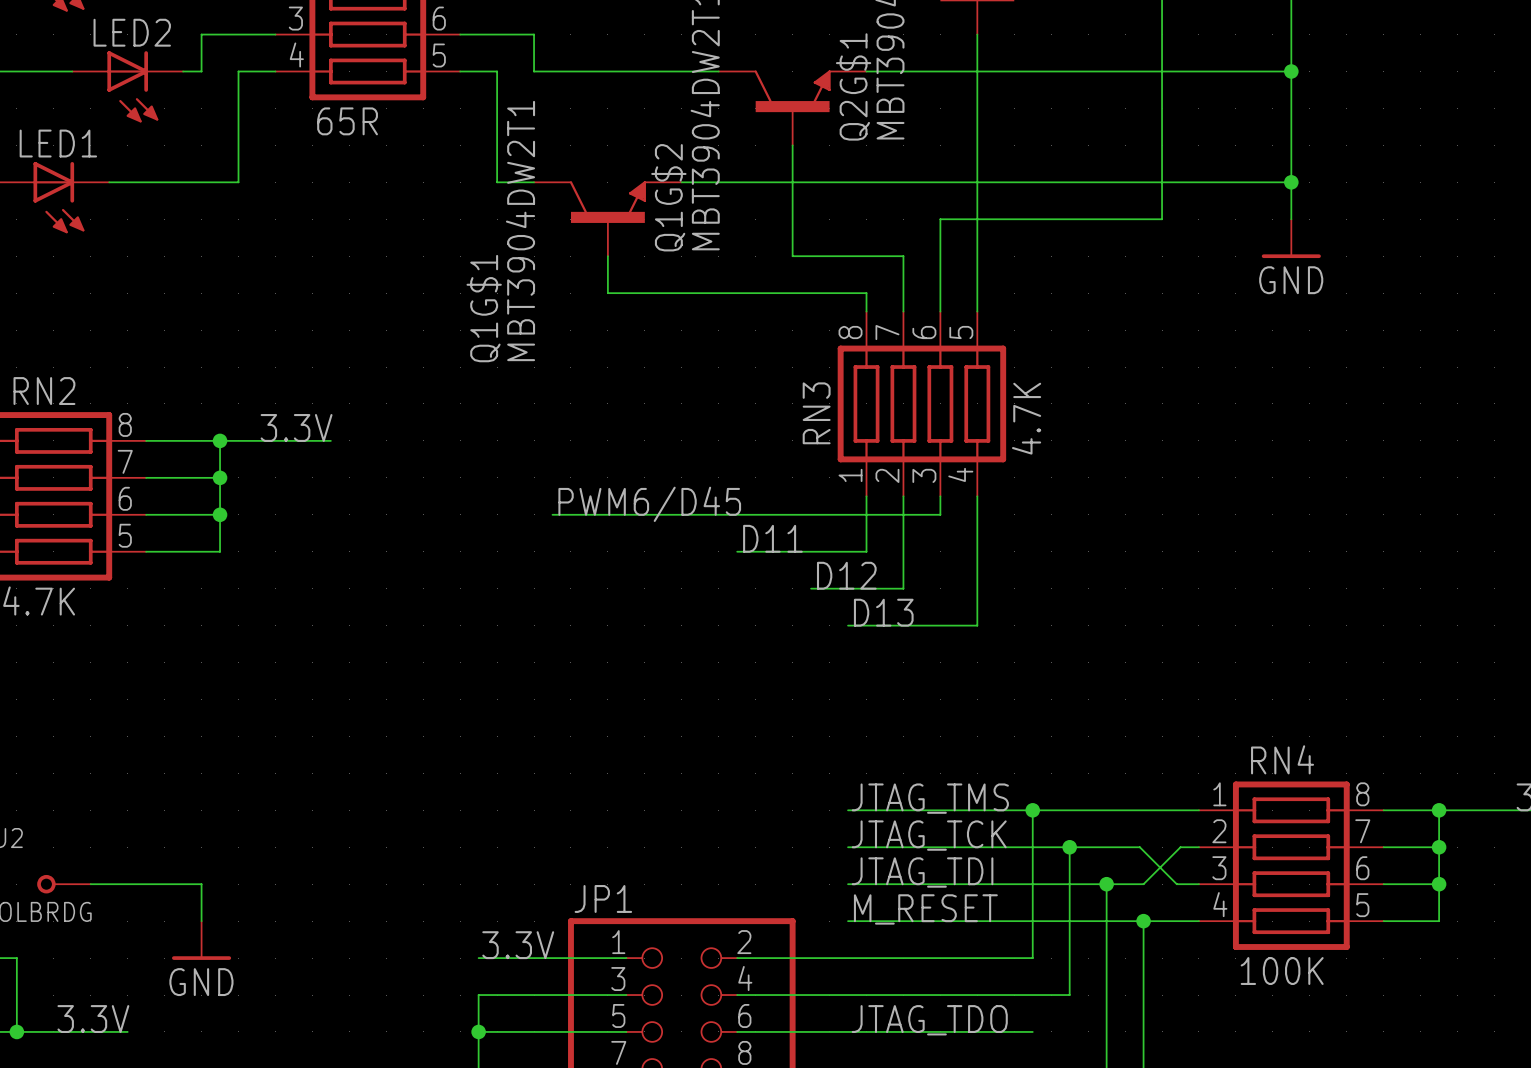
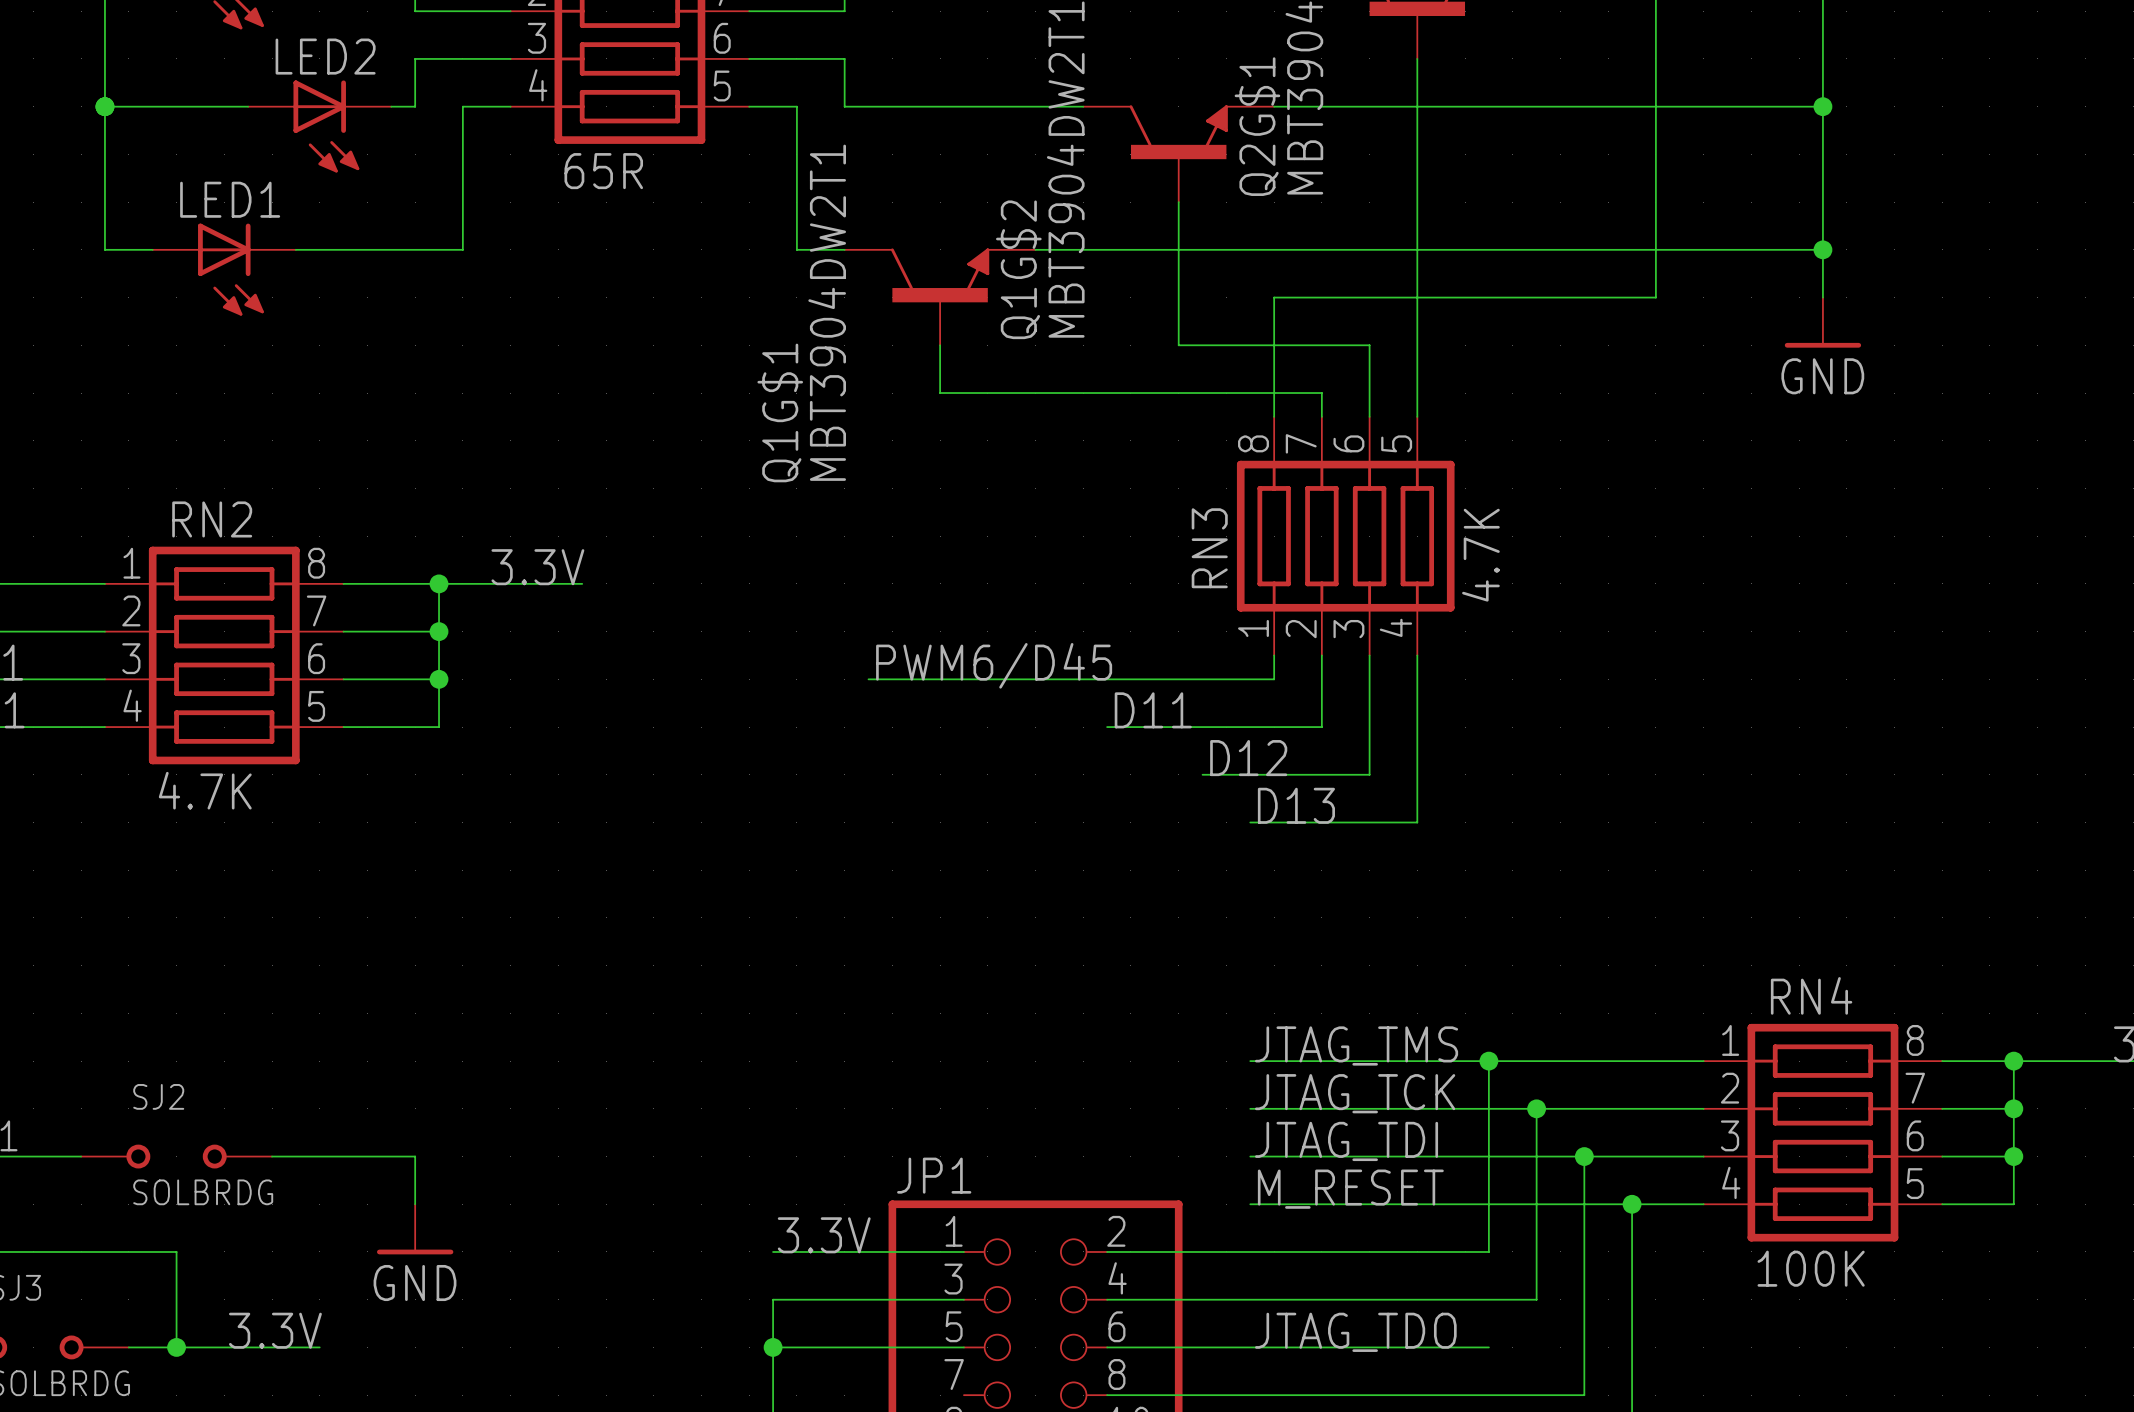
wire: (940, 219) (940, 256) -> (1321, 345) (1369, 345)
wire: (903, 256) (903, 293) -> (1369, 297) (1274, 297) (1274, 393) (1321, 393)
wire: (940, 514) (866, 514) (866, 551) -> (1369, 679) (1369, 774) (1321, 774)
wire: (903, 551) (903, 588) -> (1321, 727) (1274, 727)
wire: (1139, 847) (1176, 884) -> (1632, 1156) (1675, 1156)
wire: (1180, 847) (1143, 884) -> (1679, 1108) (1627, 1108)

